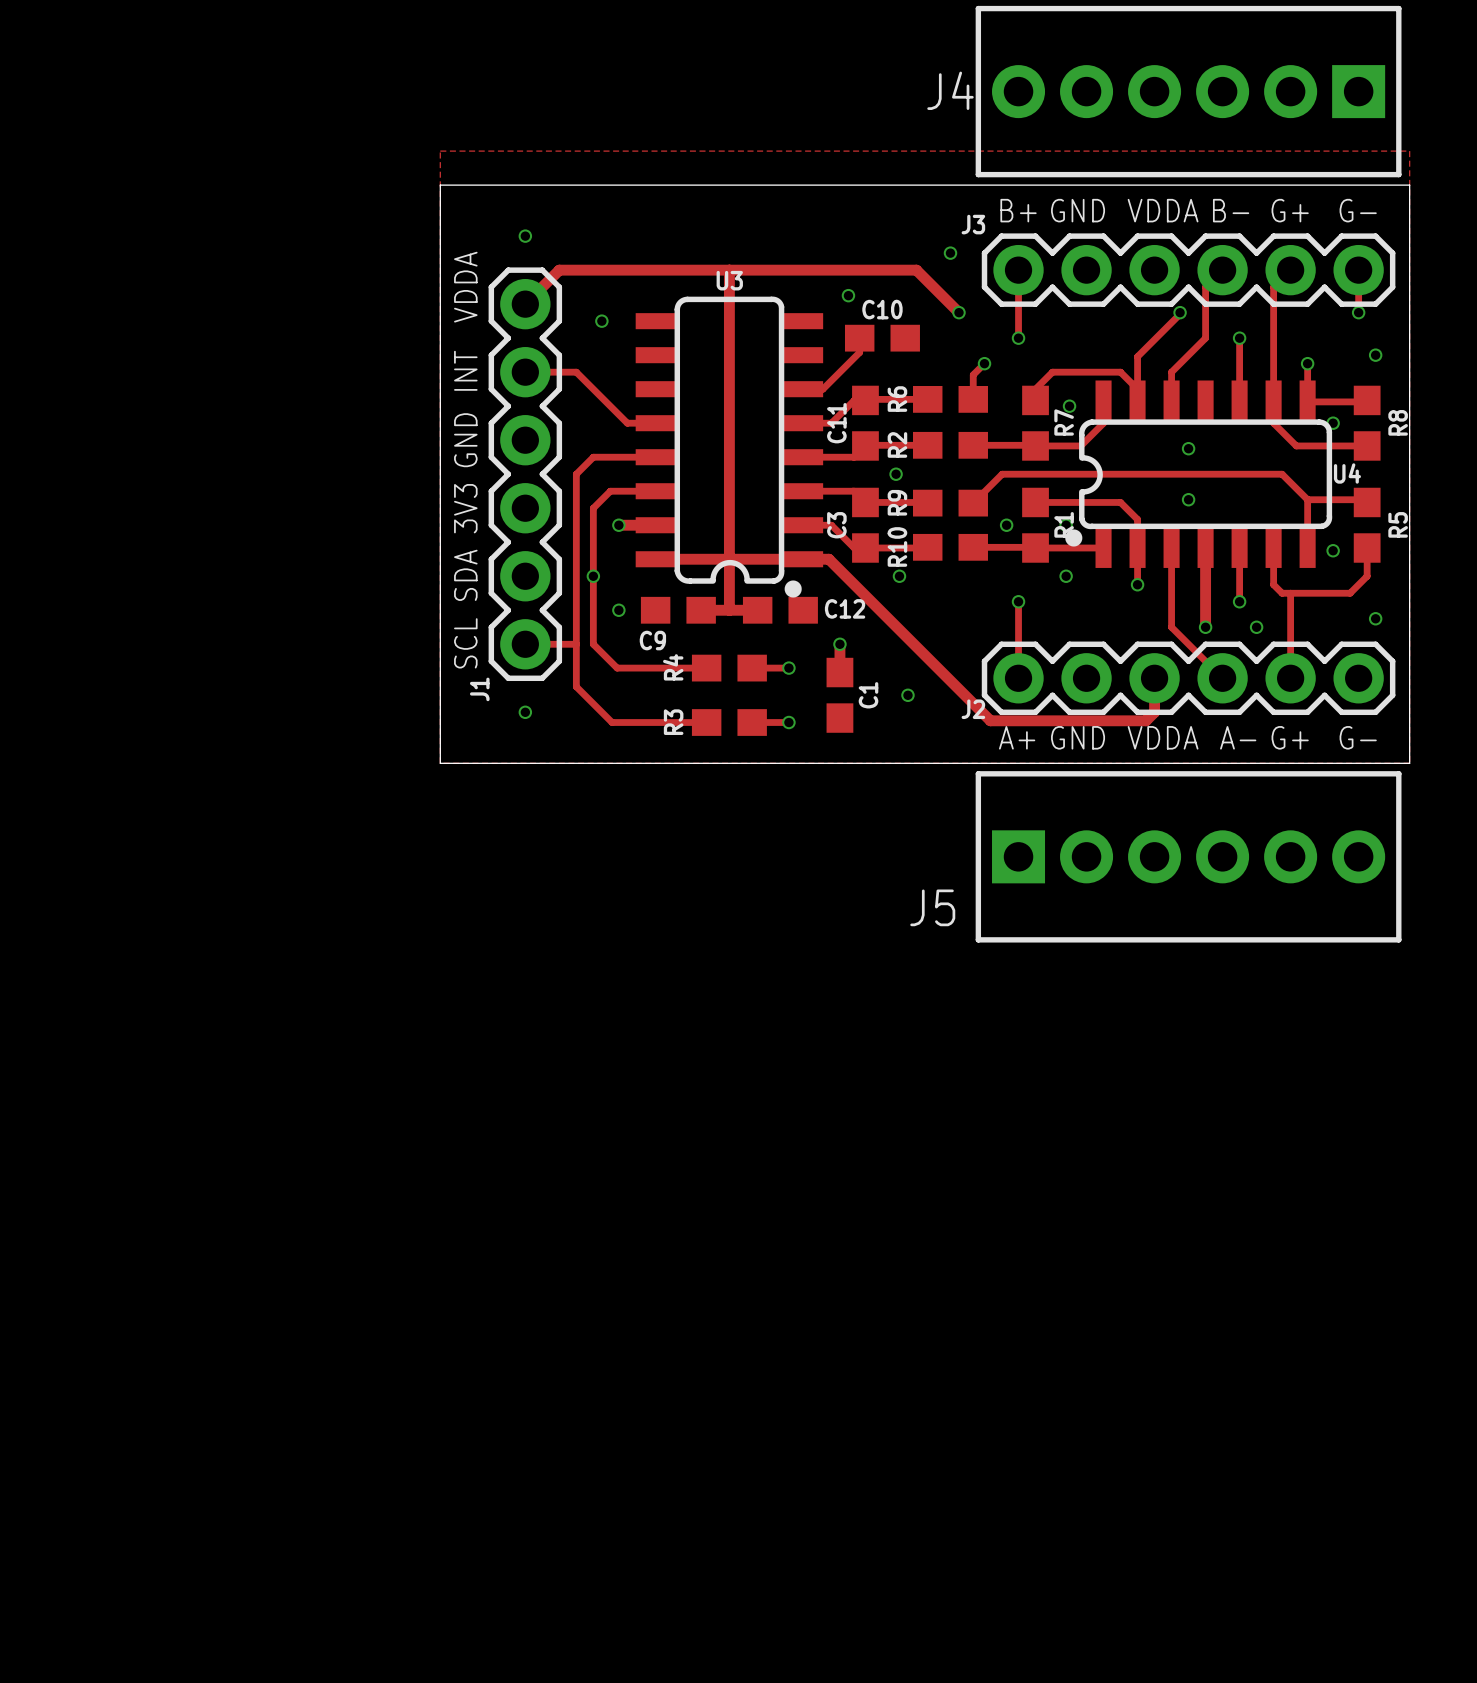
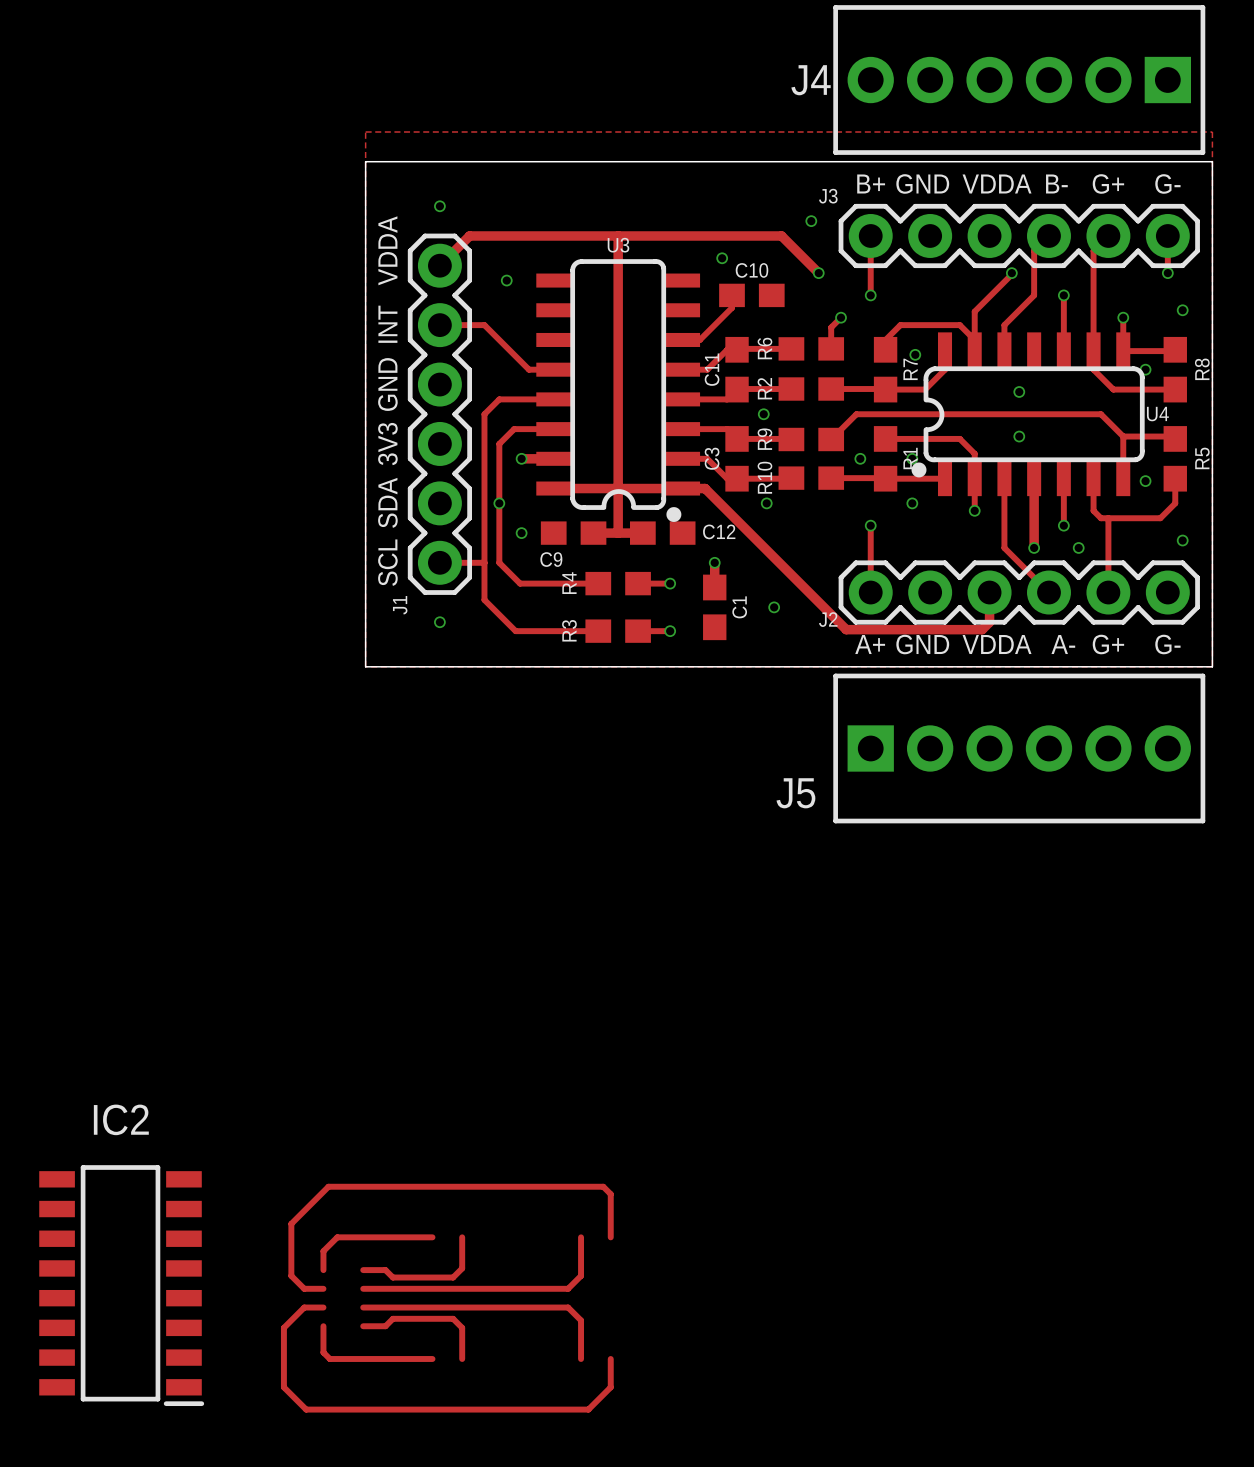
track: none -> (432, 1237) (337, 1237) (323, 1251) (323, 1270)
track: none -> (462, 1237) (462, 1268) (453, 1277) (392, 1277) (385, 1270) (363, 1270)
track: none -> (581, 1237) (581, 1275) (568, 1288) (363, 1288)
track: none -> (610, 1237) (610, 1194) (603, 1186) (328, 1186) (291, 1223) (291, 1275) (304, 1288) (323, 1288)
IC2: none -> (121, 1285)
track: none -> (323, 1307) (304, 1307) (283, 1327) (283, 1387) (306, 1409) (588, 1409) (610, 1387) (610, 1358)
track: none -> (363, 1307) (568, 1307) (581, 1320) (581, 1358)
track: none -> (323, 1326) (323, 1352) (329, 1358) (432, 1358)
track: none -> (363, 1326) (385, 1326) (392, 1318) (453, 1318) (462, 1327) (462, 1358)

